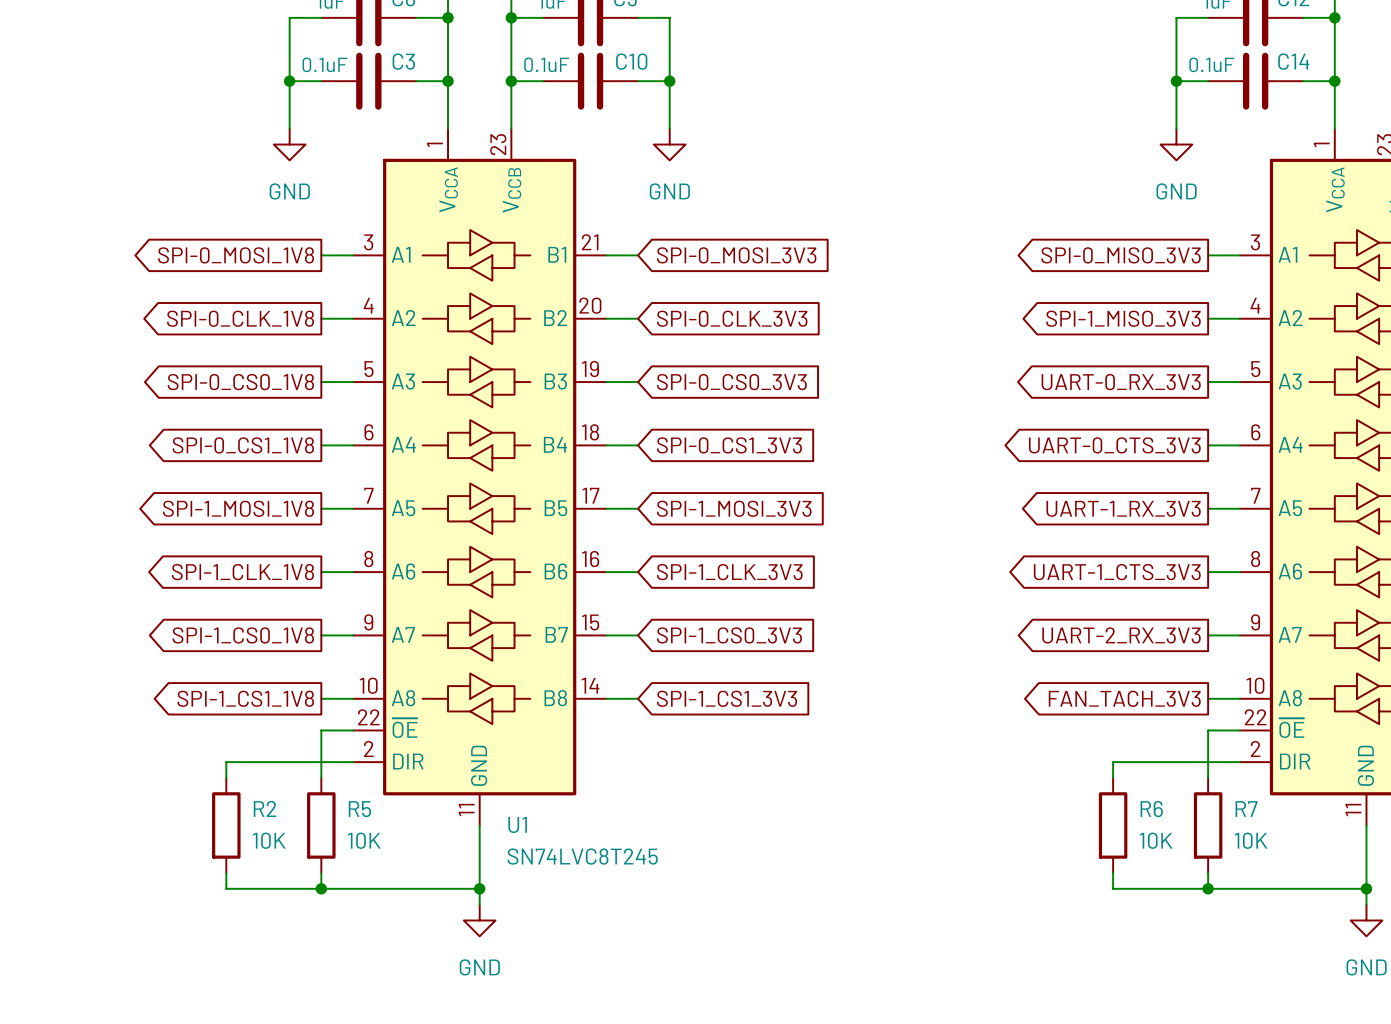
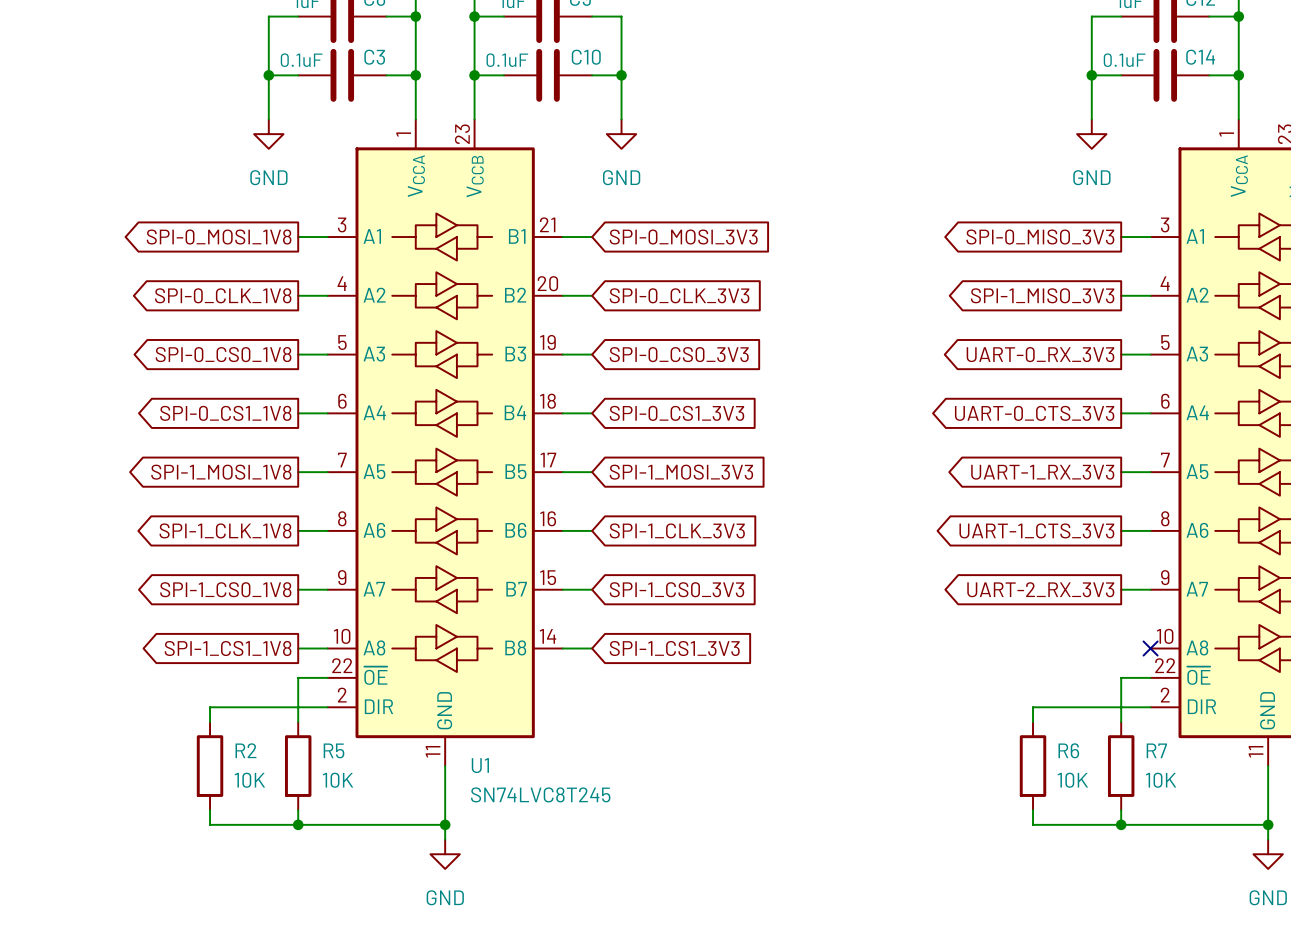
global label: FAN_TACH_3V3 (1124, 698) -> none
wire: (1208, 698) (1239, 698) -> none
no-connect mark: none -> (1150, 648)

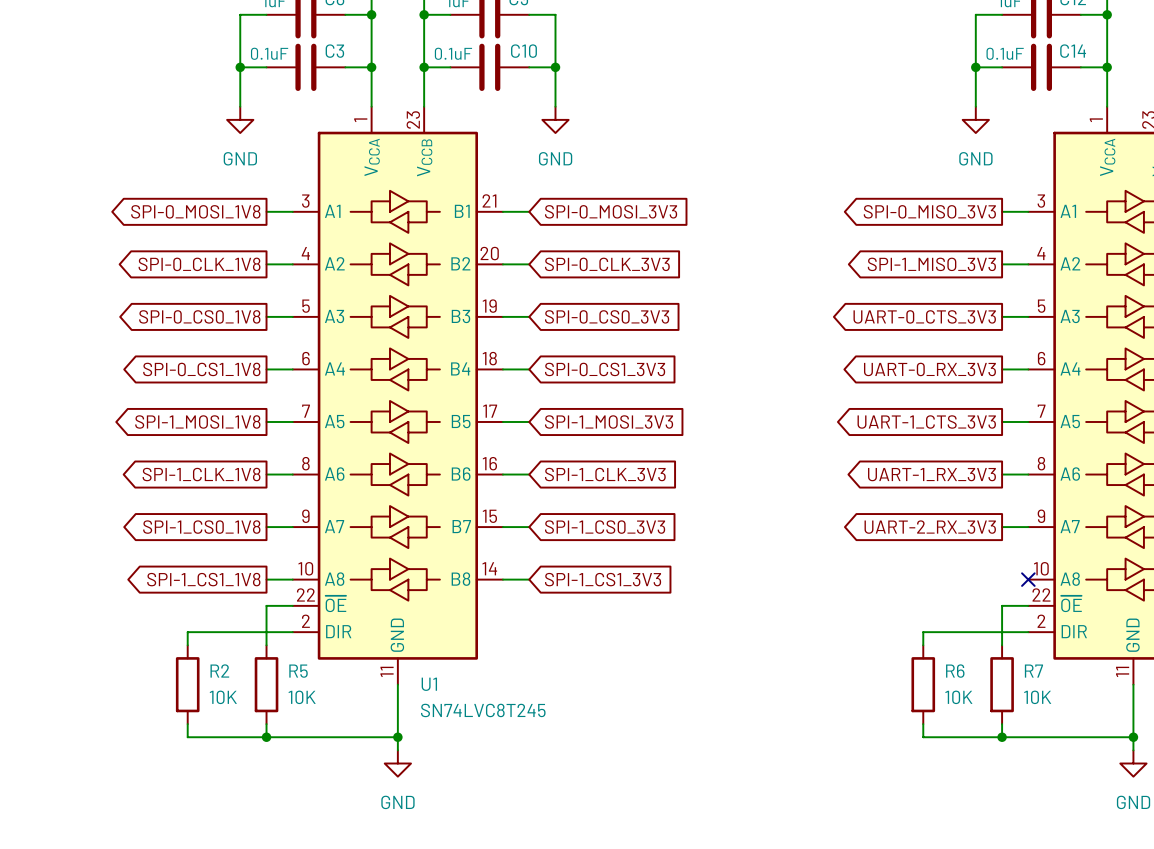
global label: UART-0_RX_3V3 (1040, 354) -> UART-0_CTS_3V3 (924, 316)
global label: UART-0_CTS_3V3 (1034, 413) -> UART-0_RX_3V3 (929, 369)
global label: UART-1_RX_3V3 (1042, 472) -> UART-1_CTS_3V3 (926, 422)
global label: UART-1_CTS_3V3 (1036, 530) -> UART-1_RX_3V3 (931, 474)

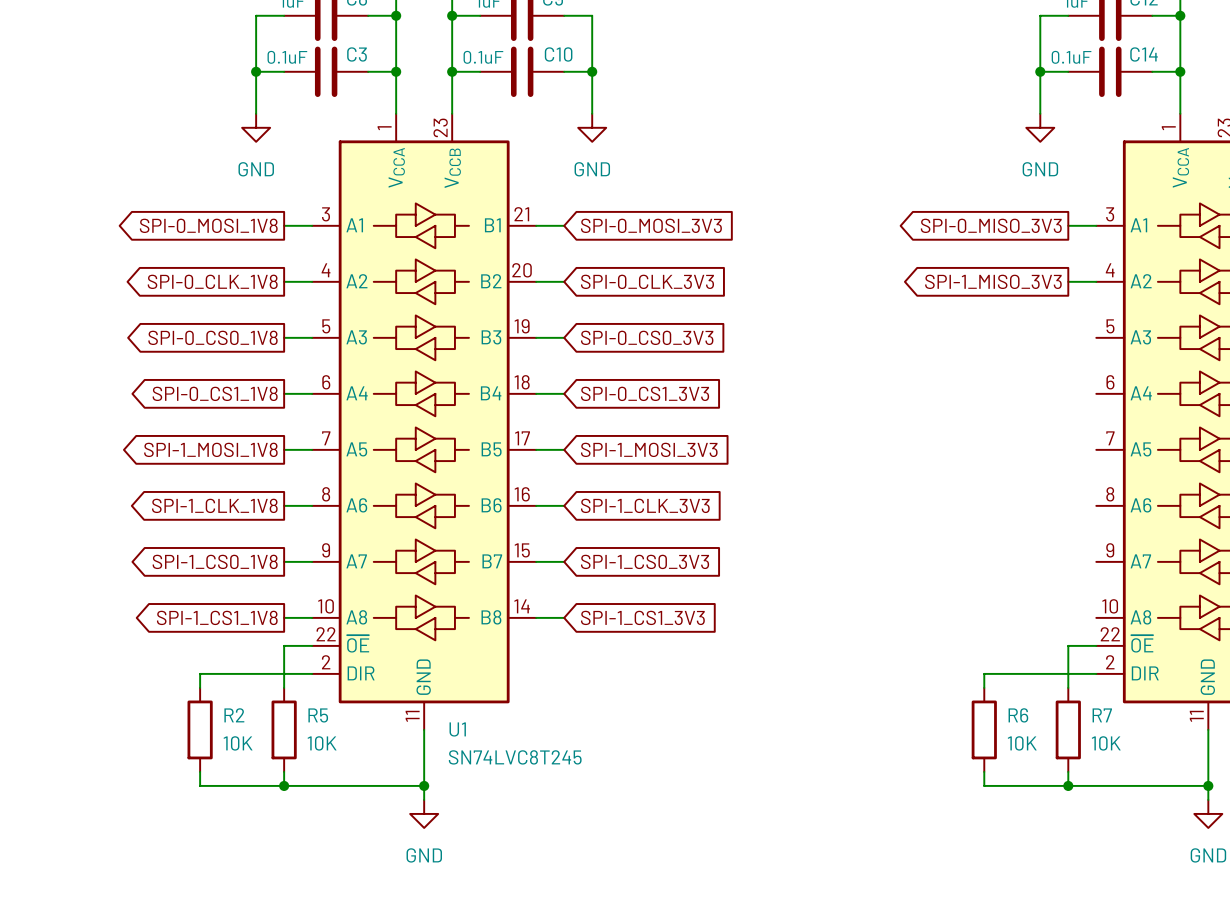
global label: UART-0_CTS_3V3 (924, 316) -> none
wire: (1002, 316) (1028, 316) -> none
global label: UART-0_RX_3V3 (929, 369) -> none
wire: (1002, 369) (1028, 369) -> none
wire: (1002, 421) (1028, 421) -> none
global label: UART-1_CTS_3V3 (926, 422) -> none
global label: UART-1_RX_3V3 (931, 474) -> none
wire: (1002, 474) (1028, 474) -> none
global label: UART-2_RX_3V3 (930, 527) -> none
wire: (1002, 527) (1028, 527) -> none
no-connect mark: (1028, 579) -> none

